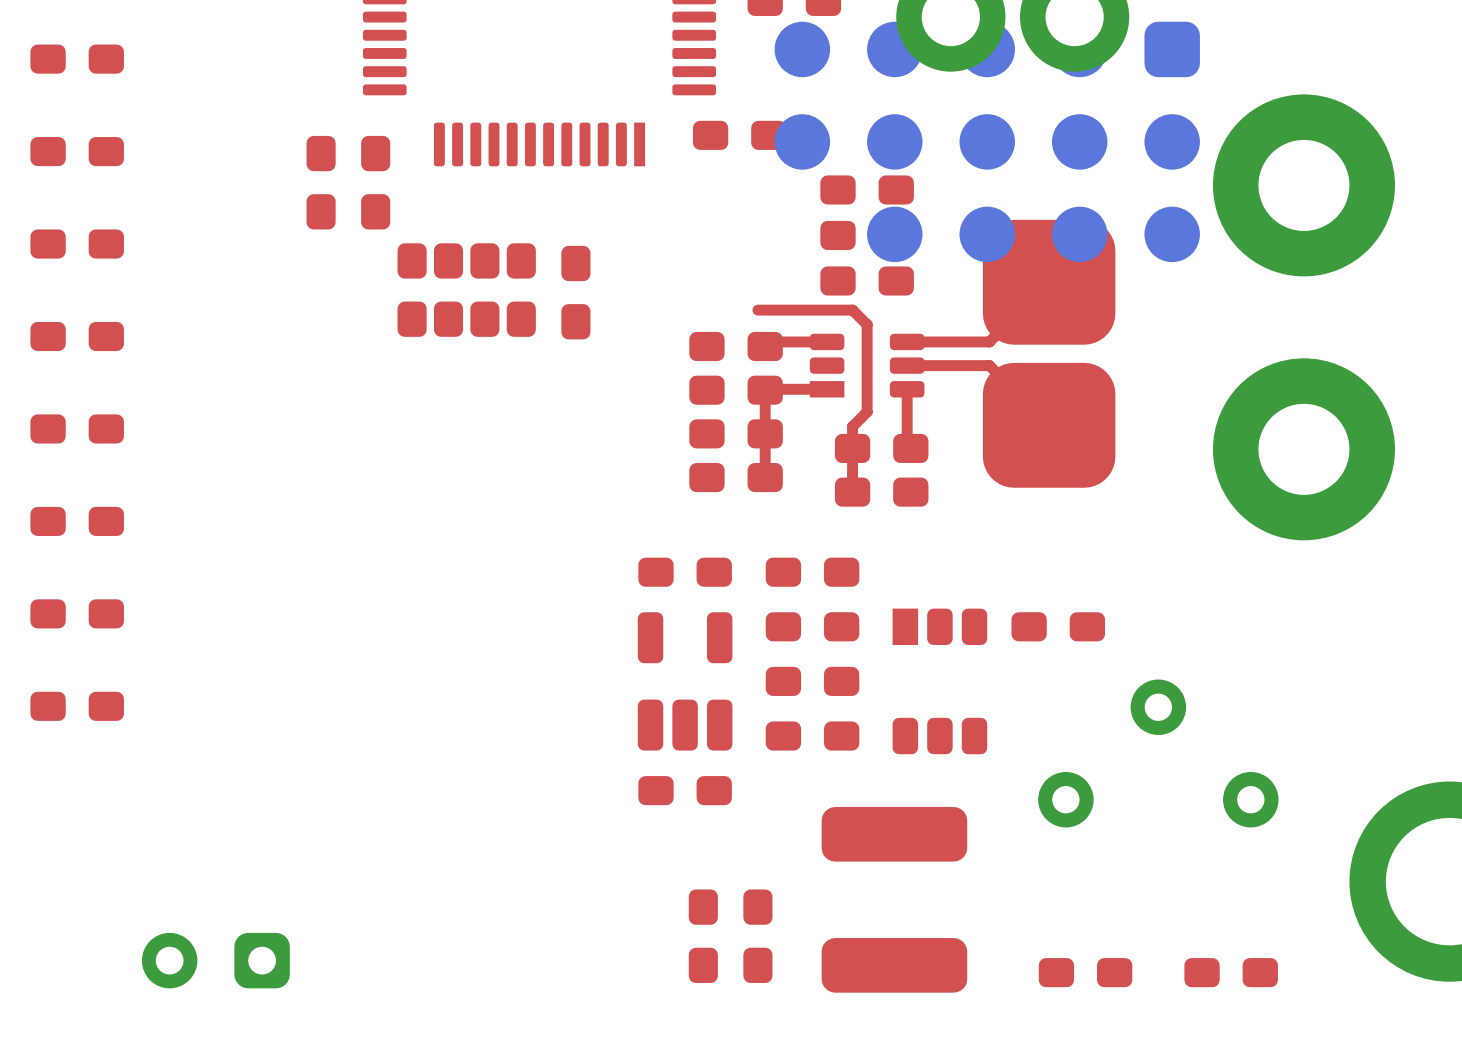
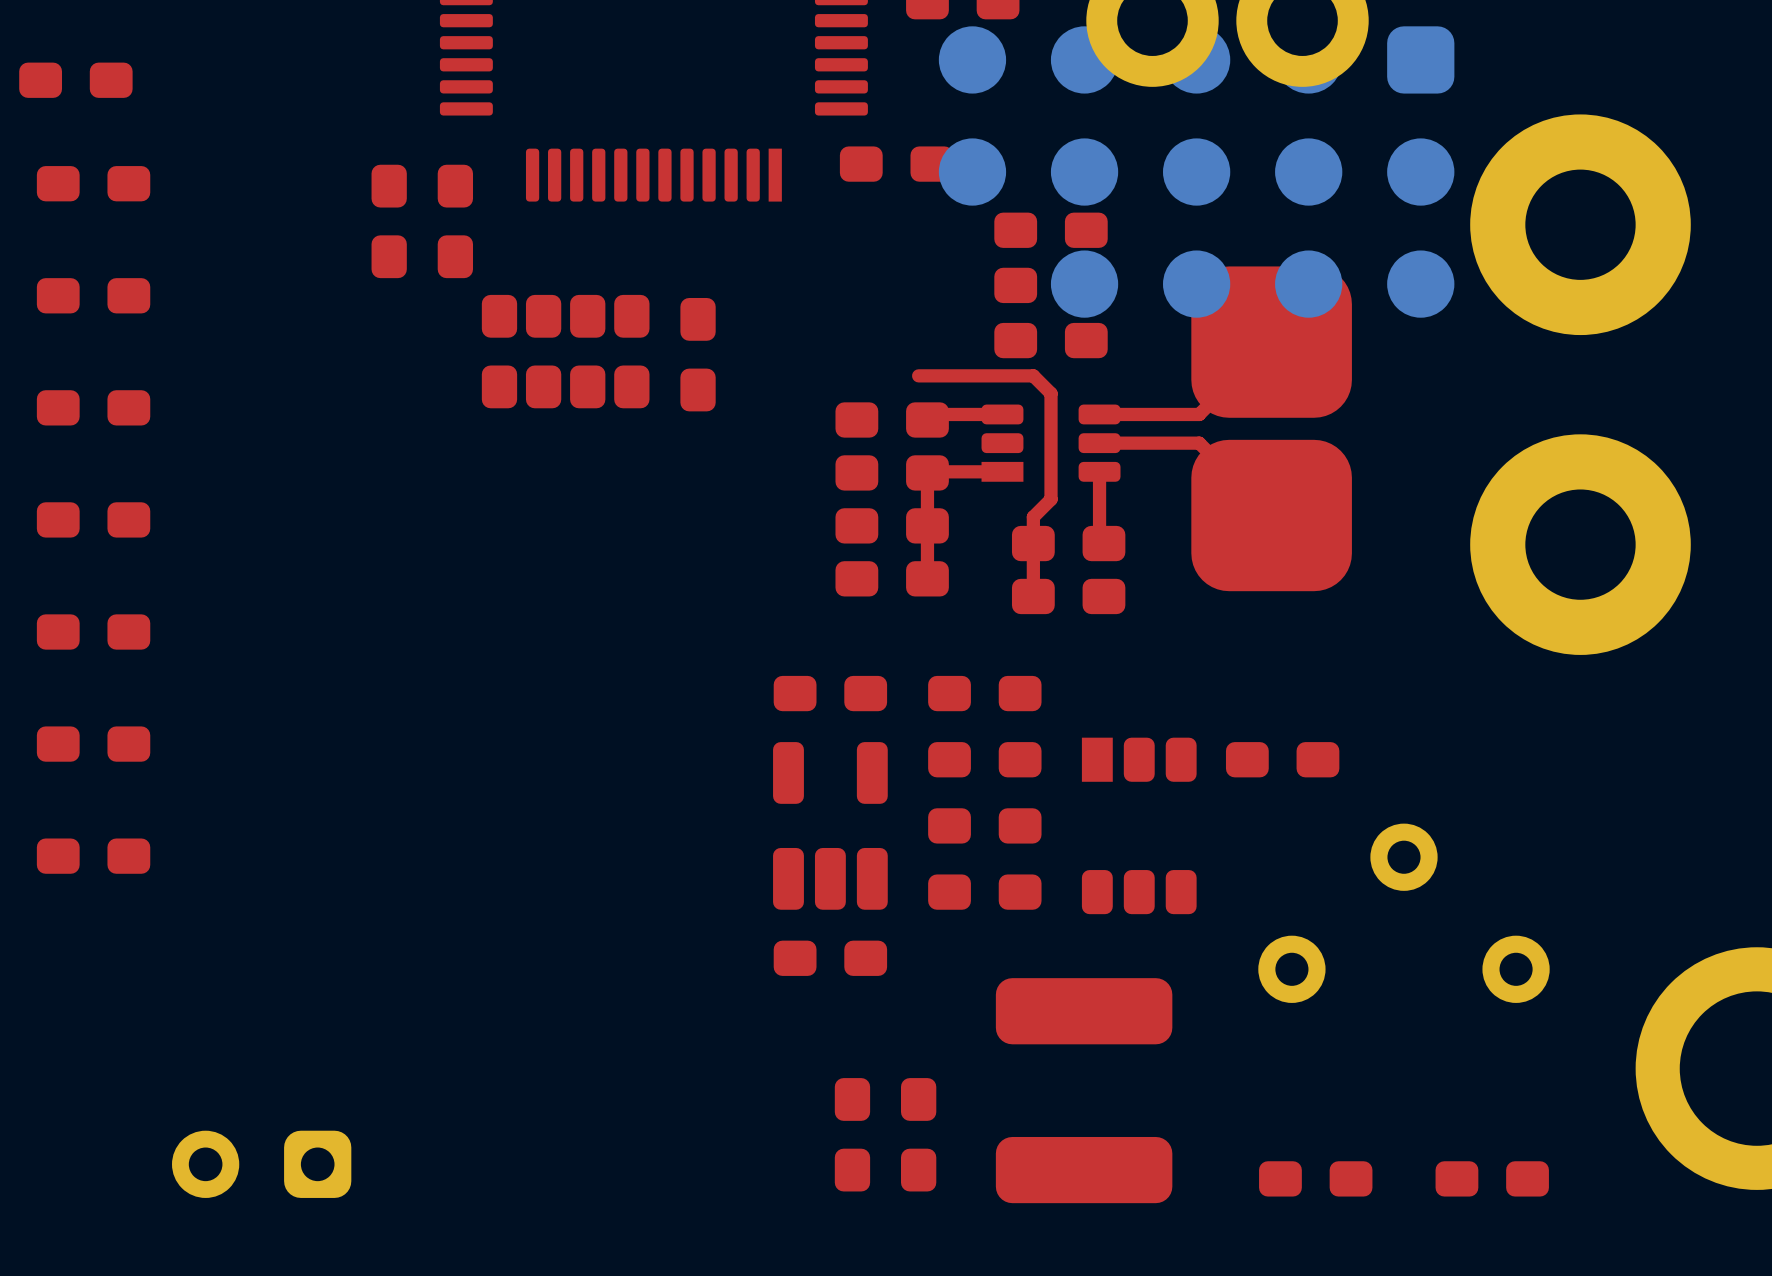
part position: (77, 59) -> (75, 80)

